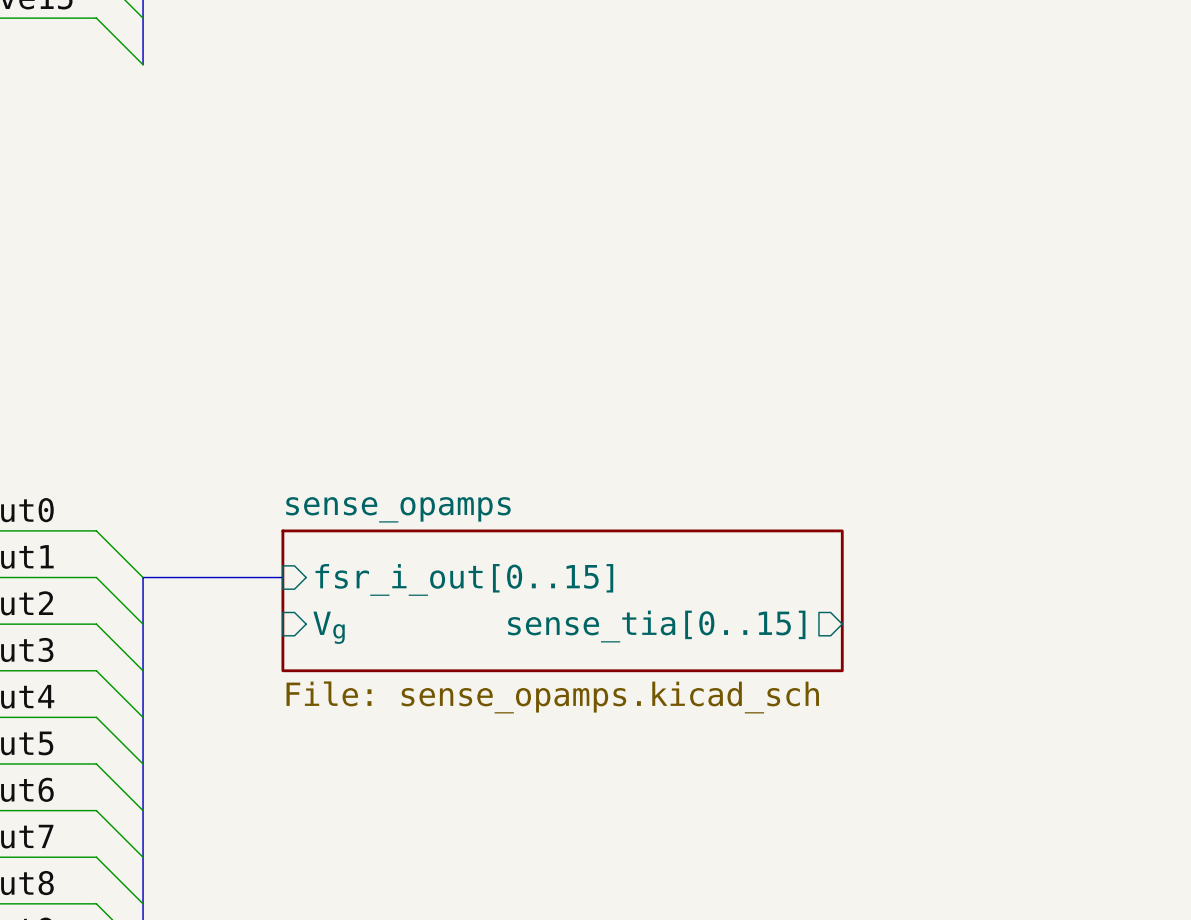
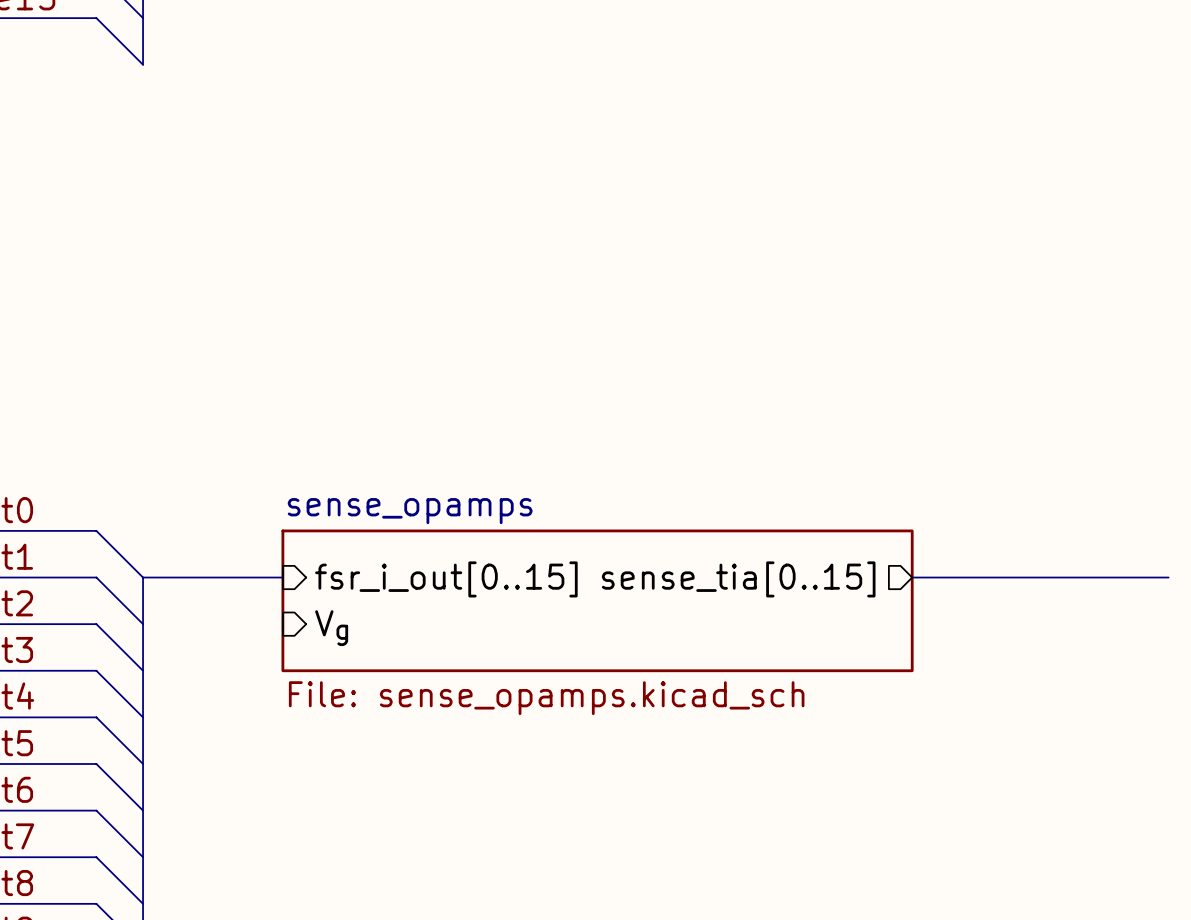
bus: none -> (912, 577) (1168, 577)
sheet sense_opamps: File: sense_opamps.kicad_sch (562, 600) -> none
sheet sense_opamps: none -> File: sense_opamps.kicad_sch (597, 600)
sheet pin position: sense_tia[0..15] (656, 626) -> sense_tia[0..15] (738, 579)

